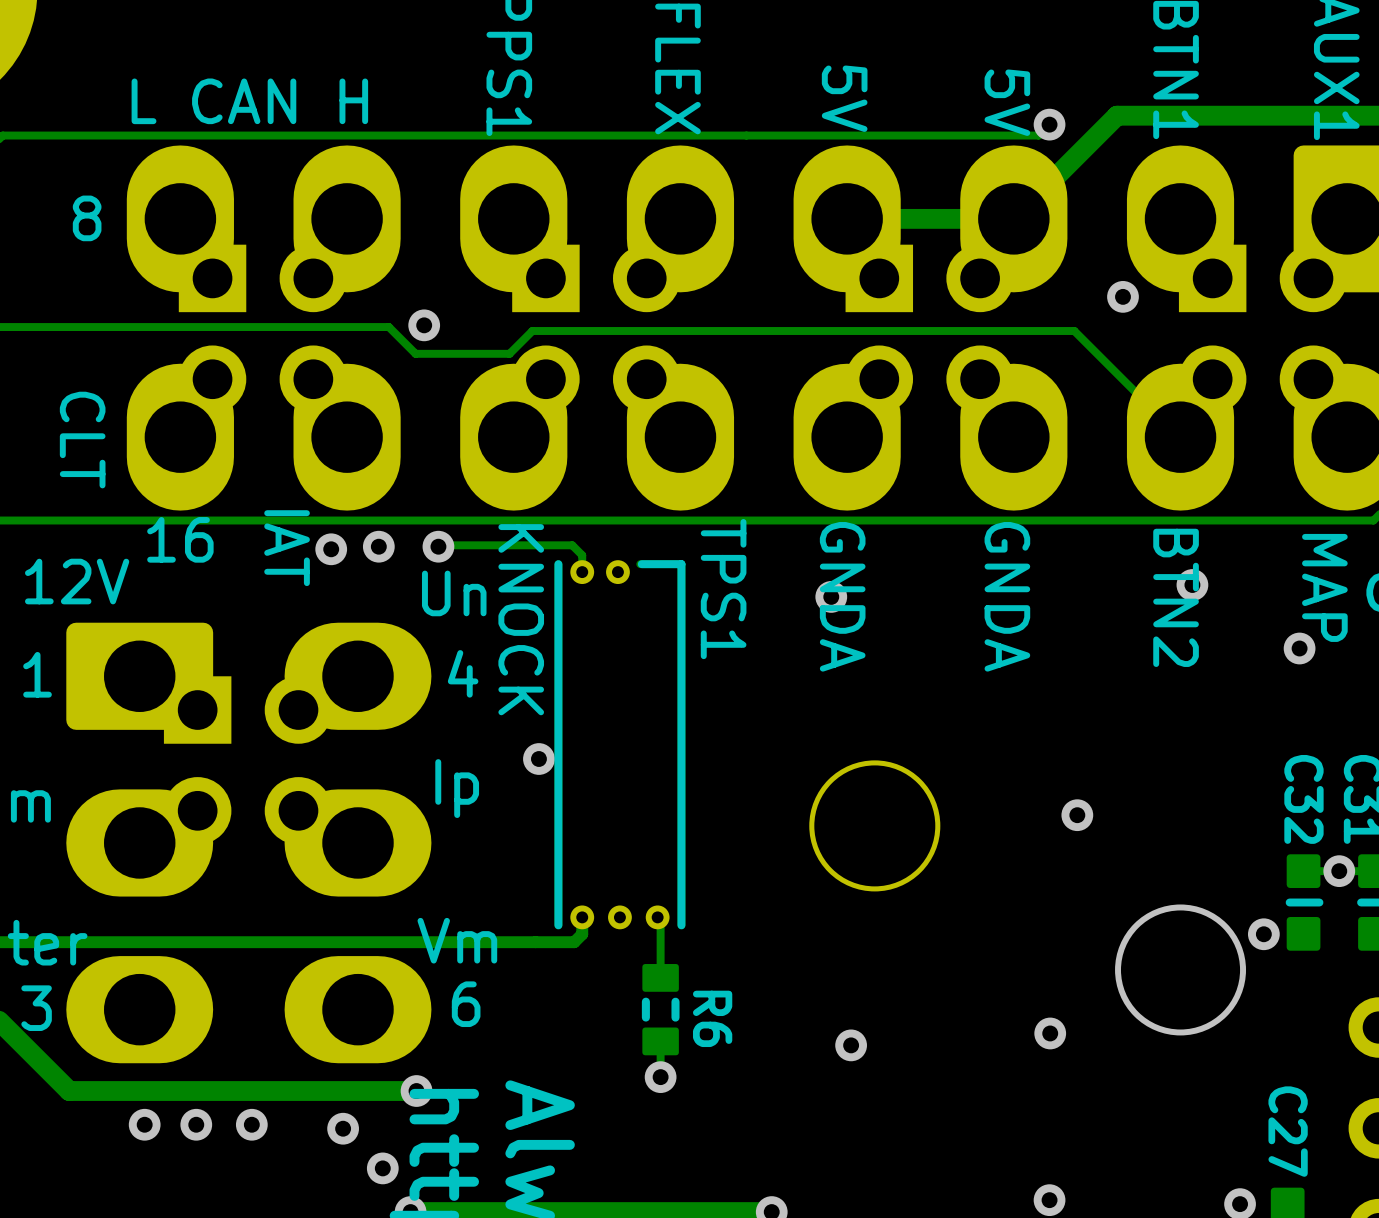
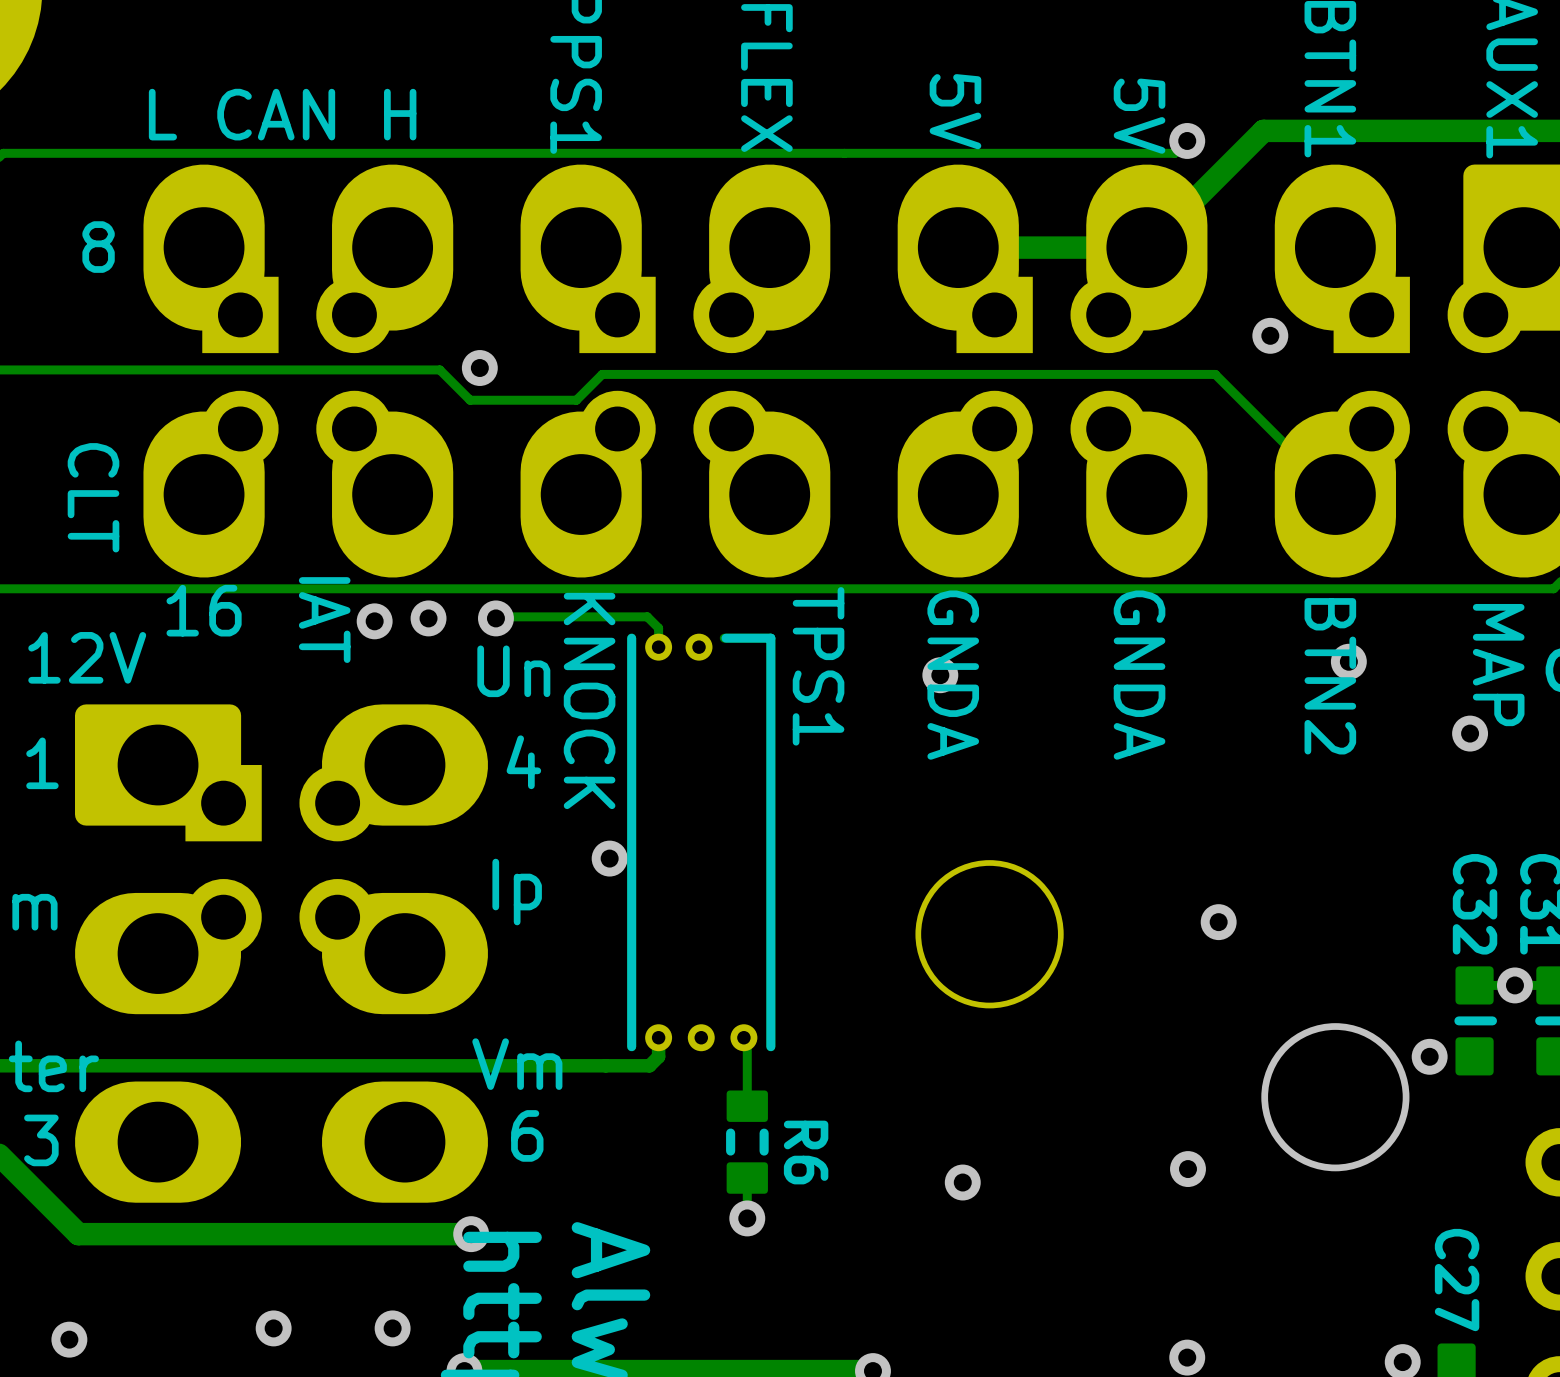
via: (144, 1124) -> none
via: (196, 1124) -> none
via: (251, 1124) -> none
via: (343, 1128) -> none
via: (382, 1168) -> none
via: none -> (273, 1328)
via: none -> (392, 1328)
via: none -> (69, 1339)

